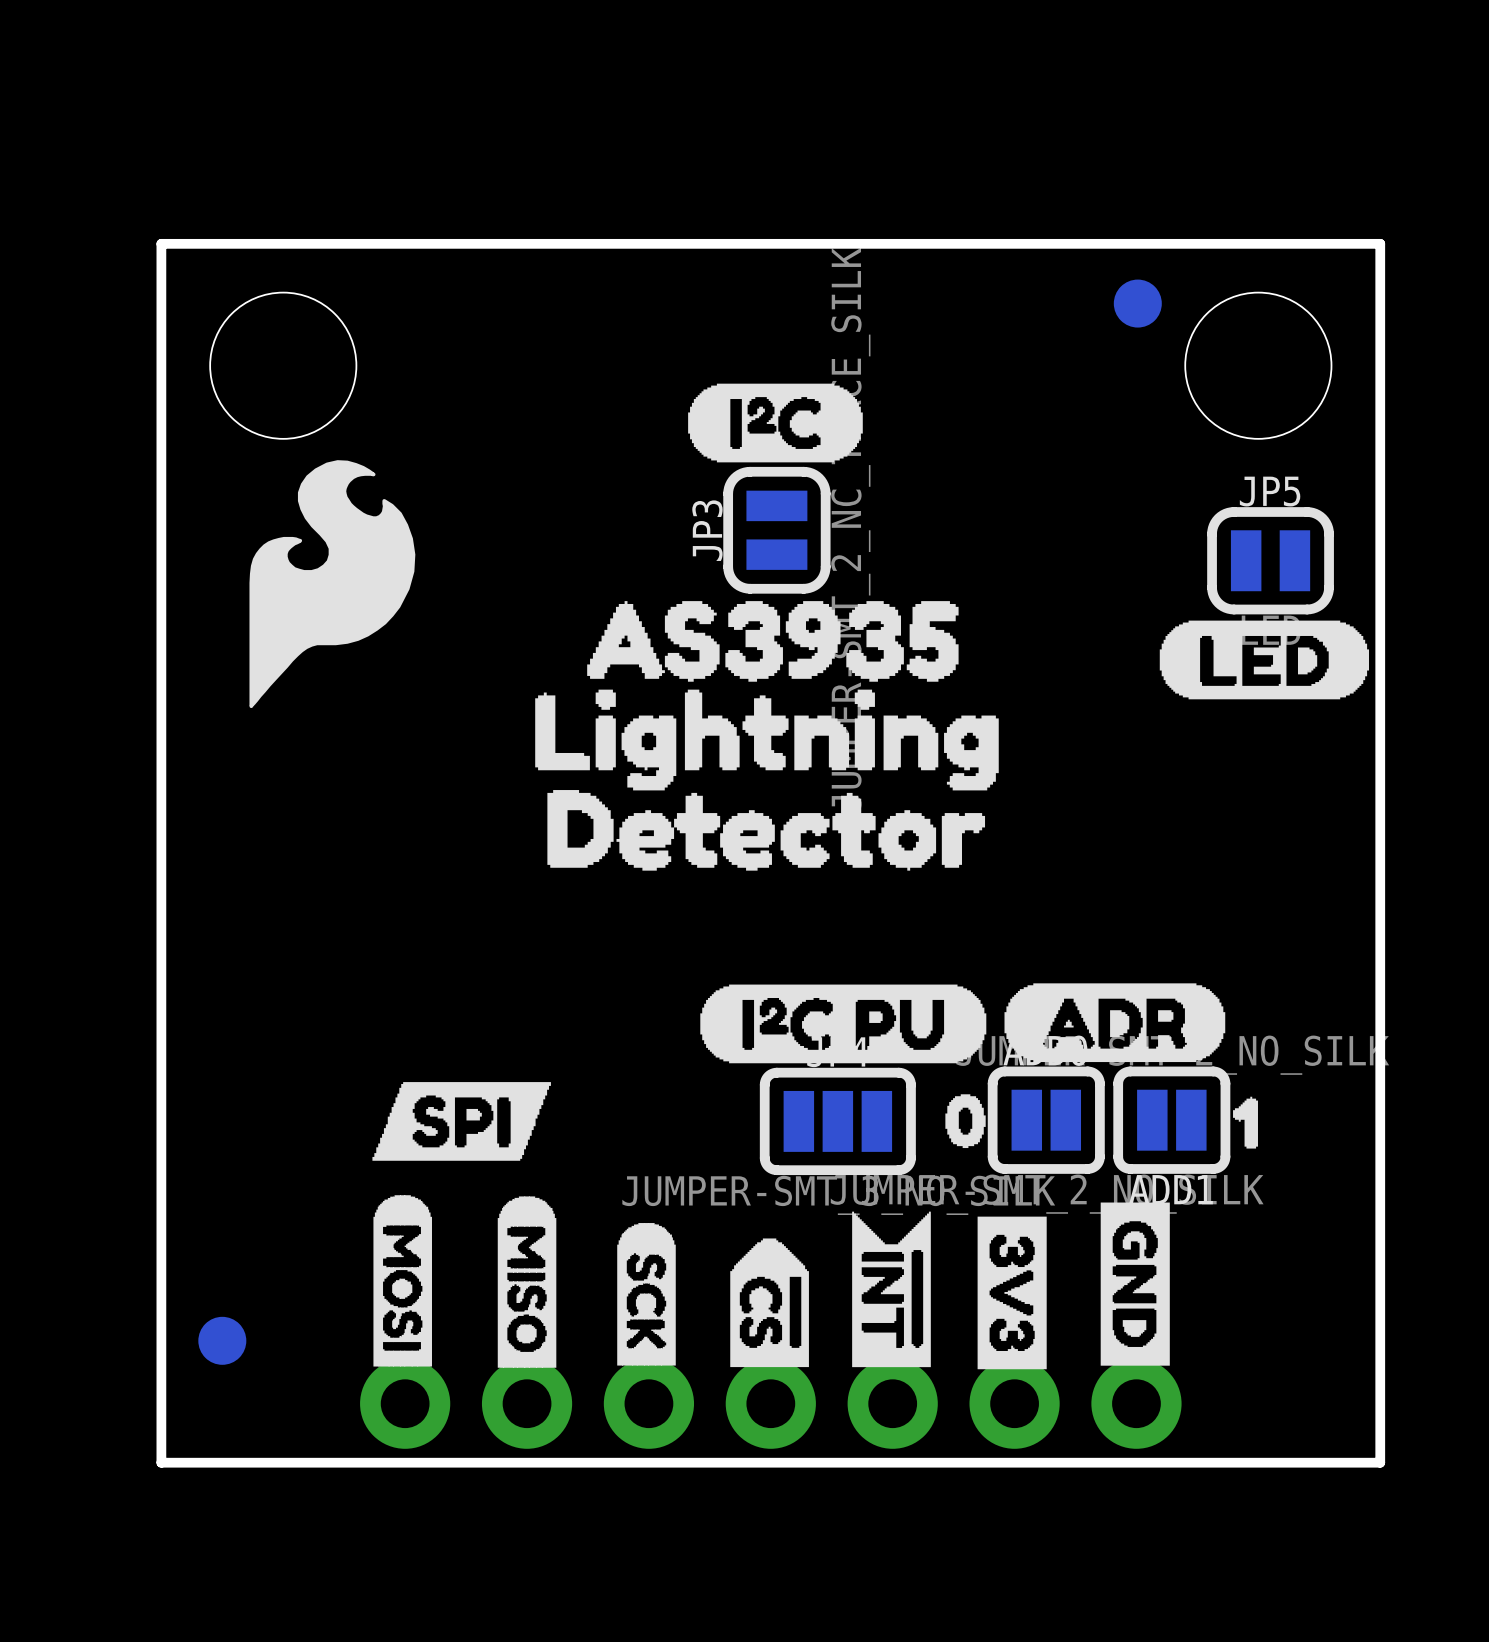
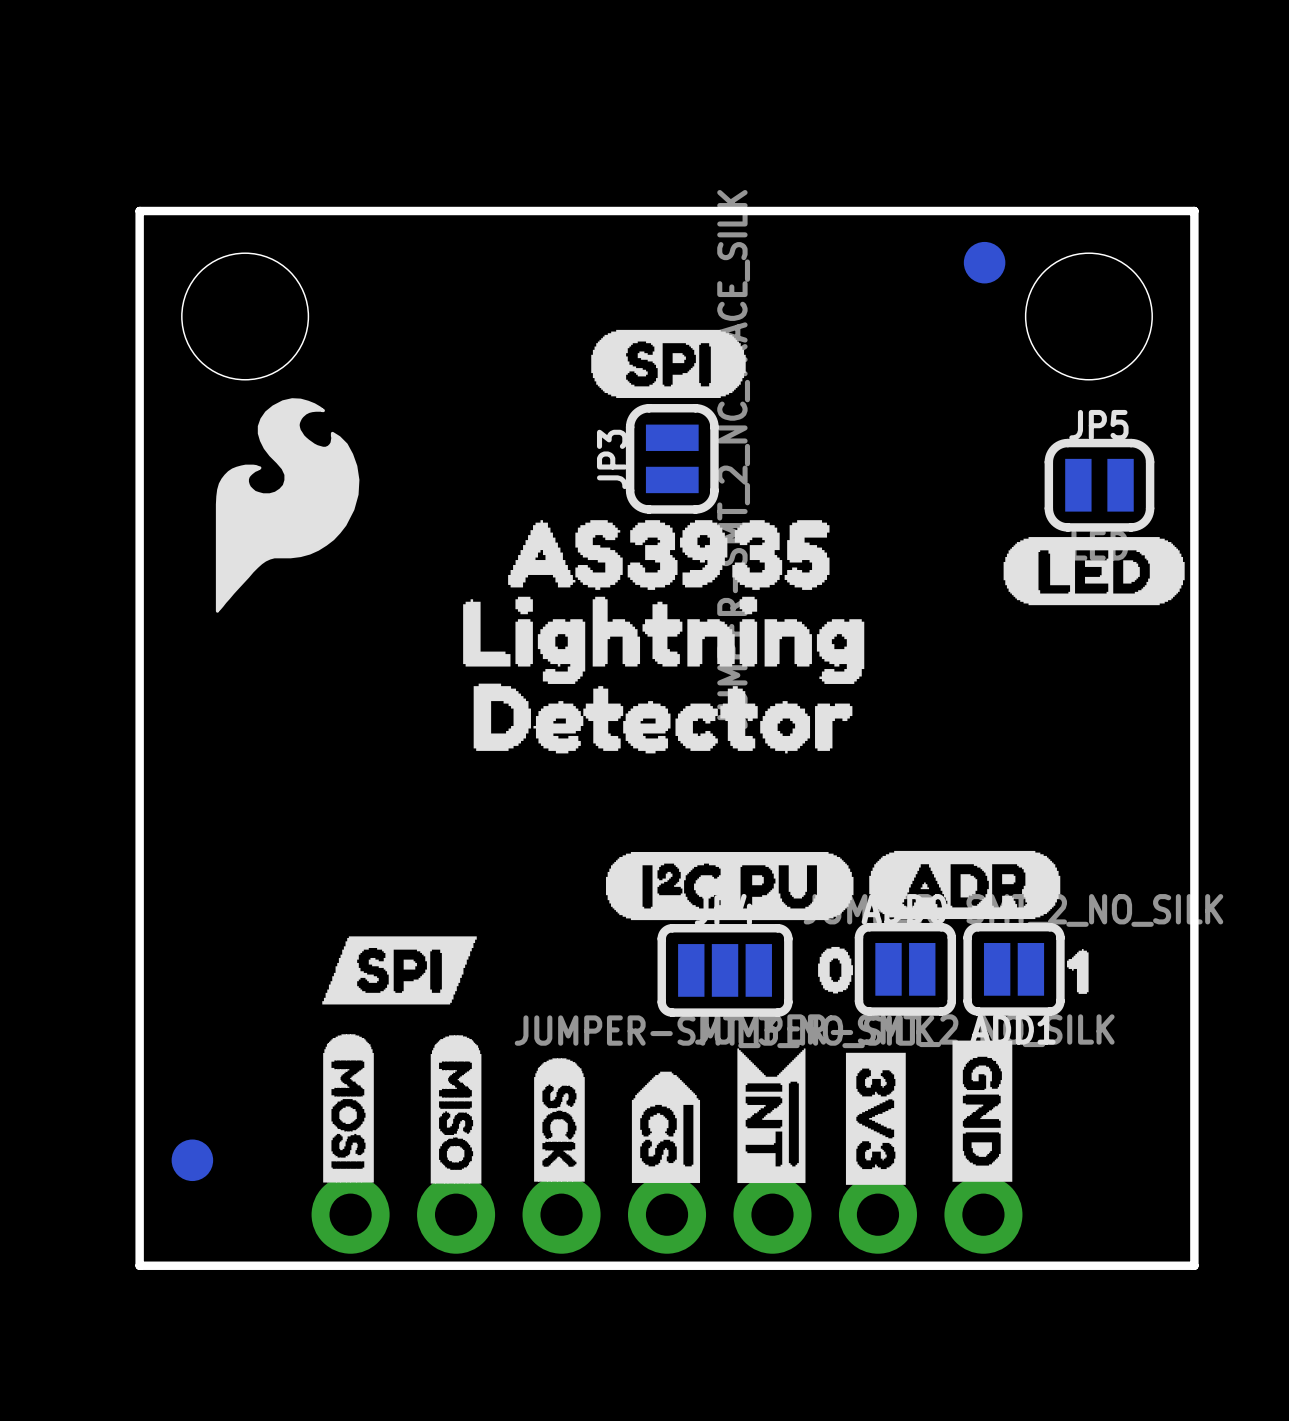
drawing shape: [688, 383, 863, 463] -> [591, 329, 746, 398]

